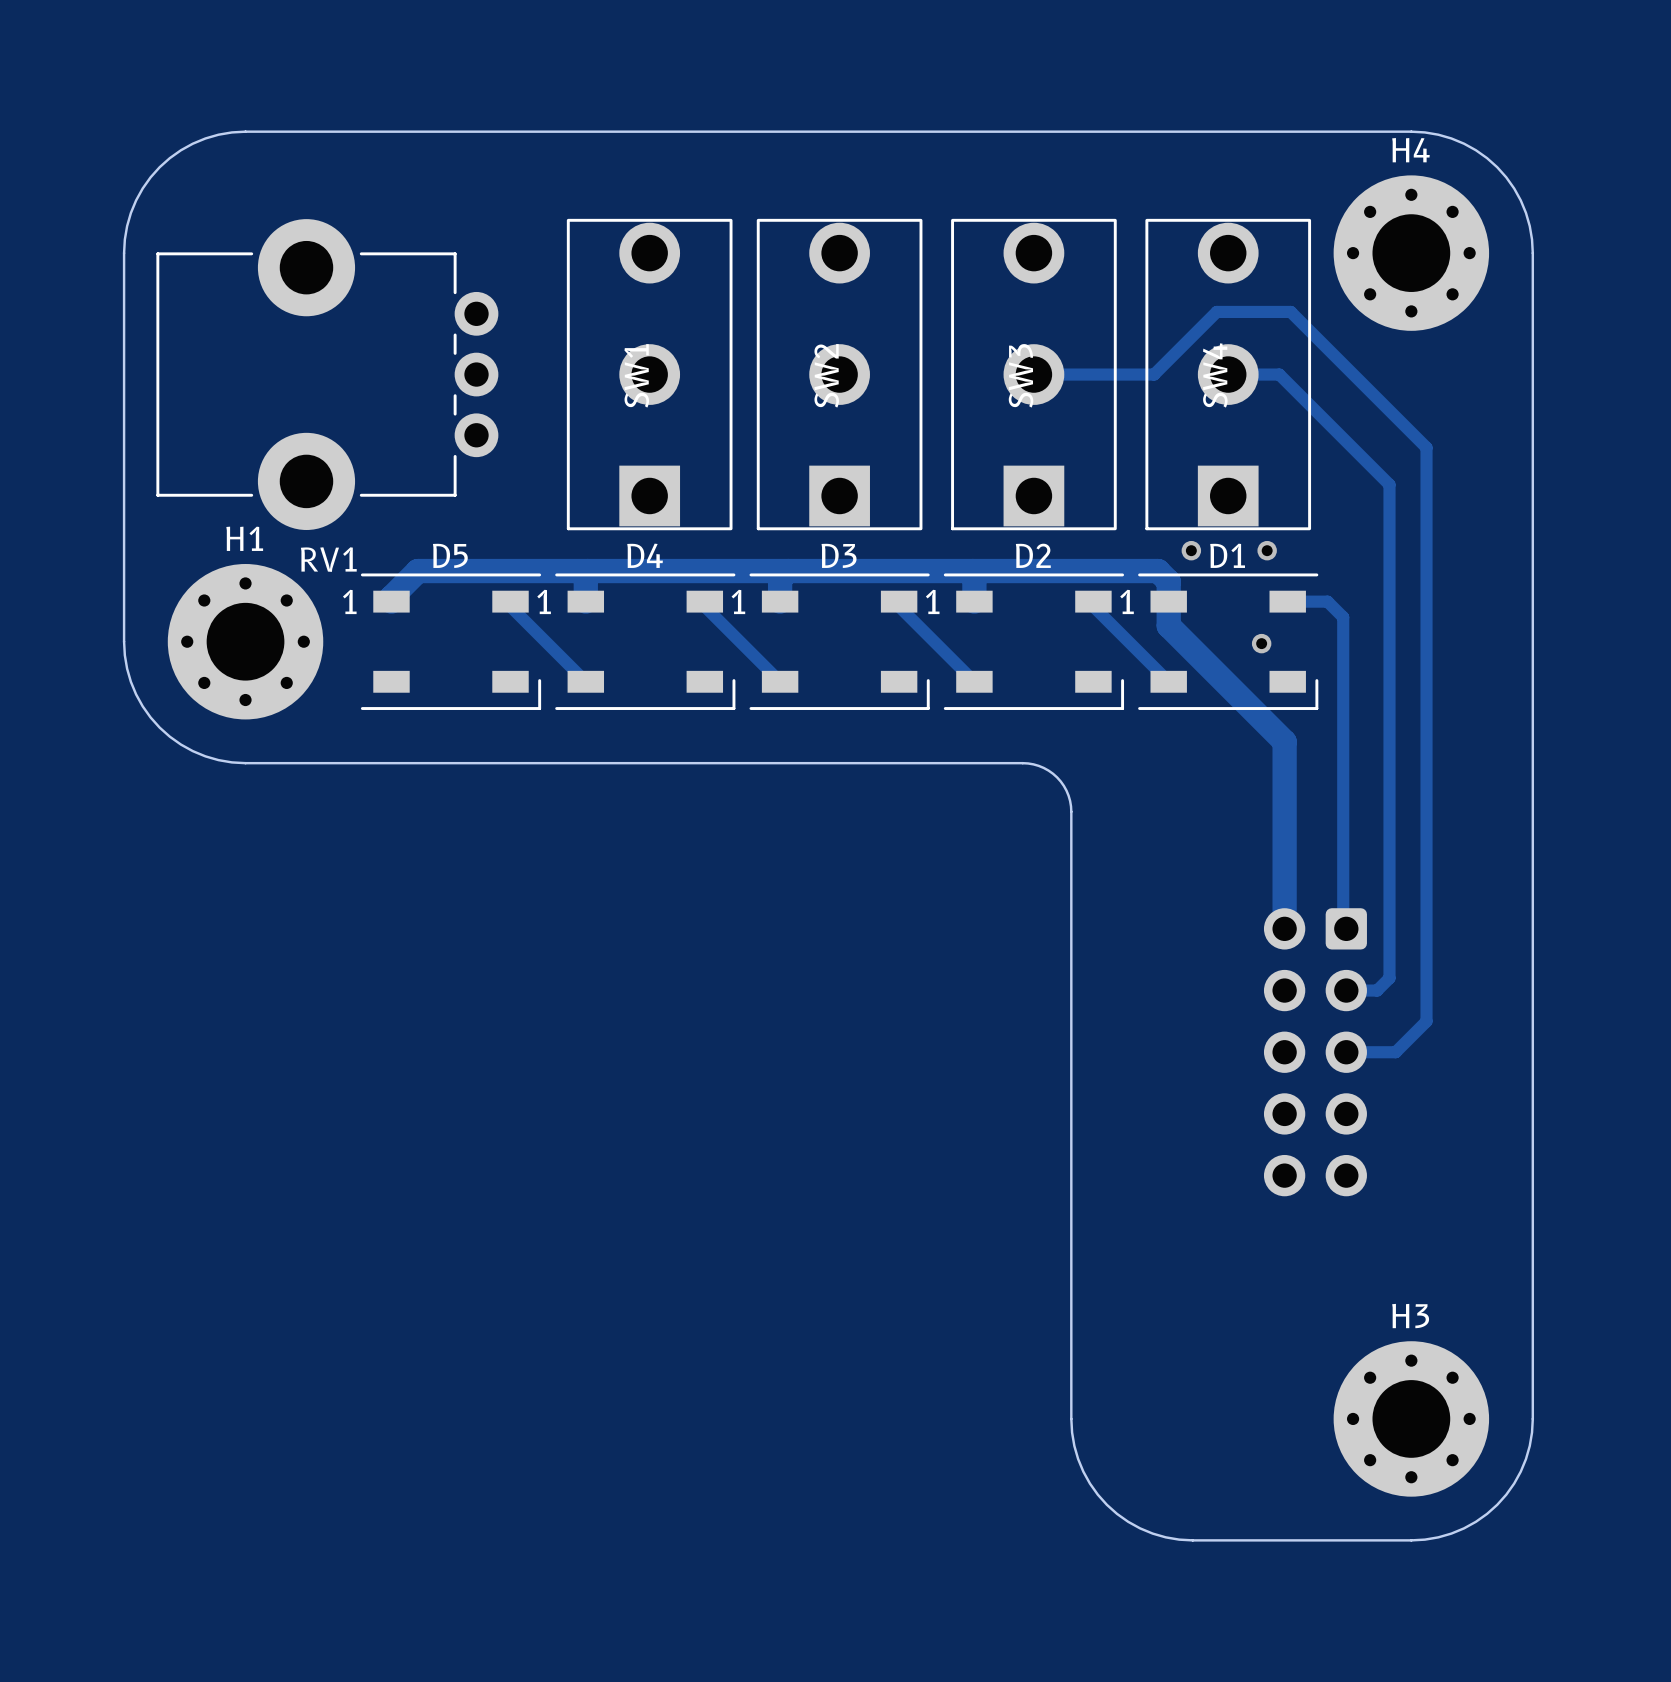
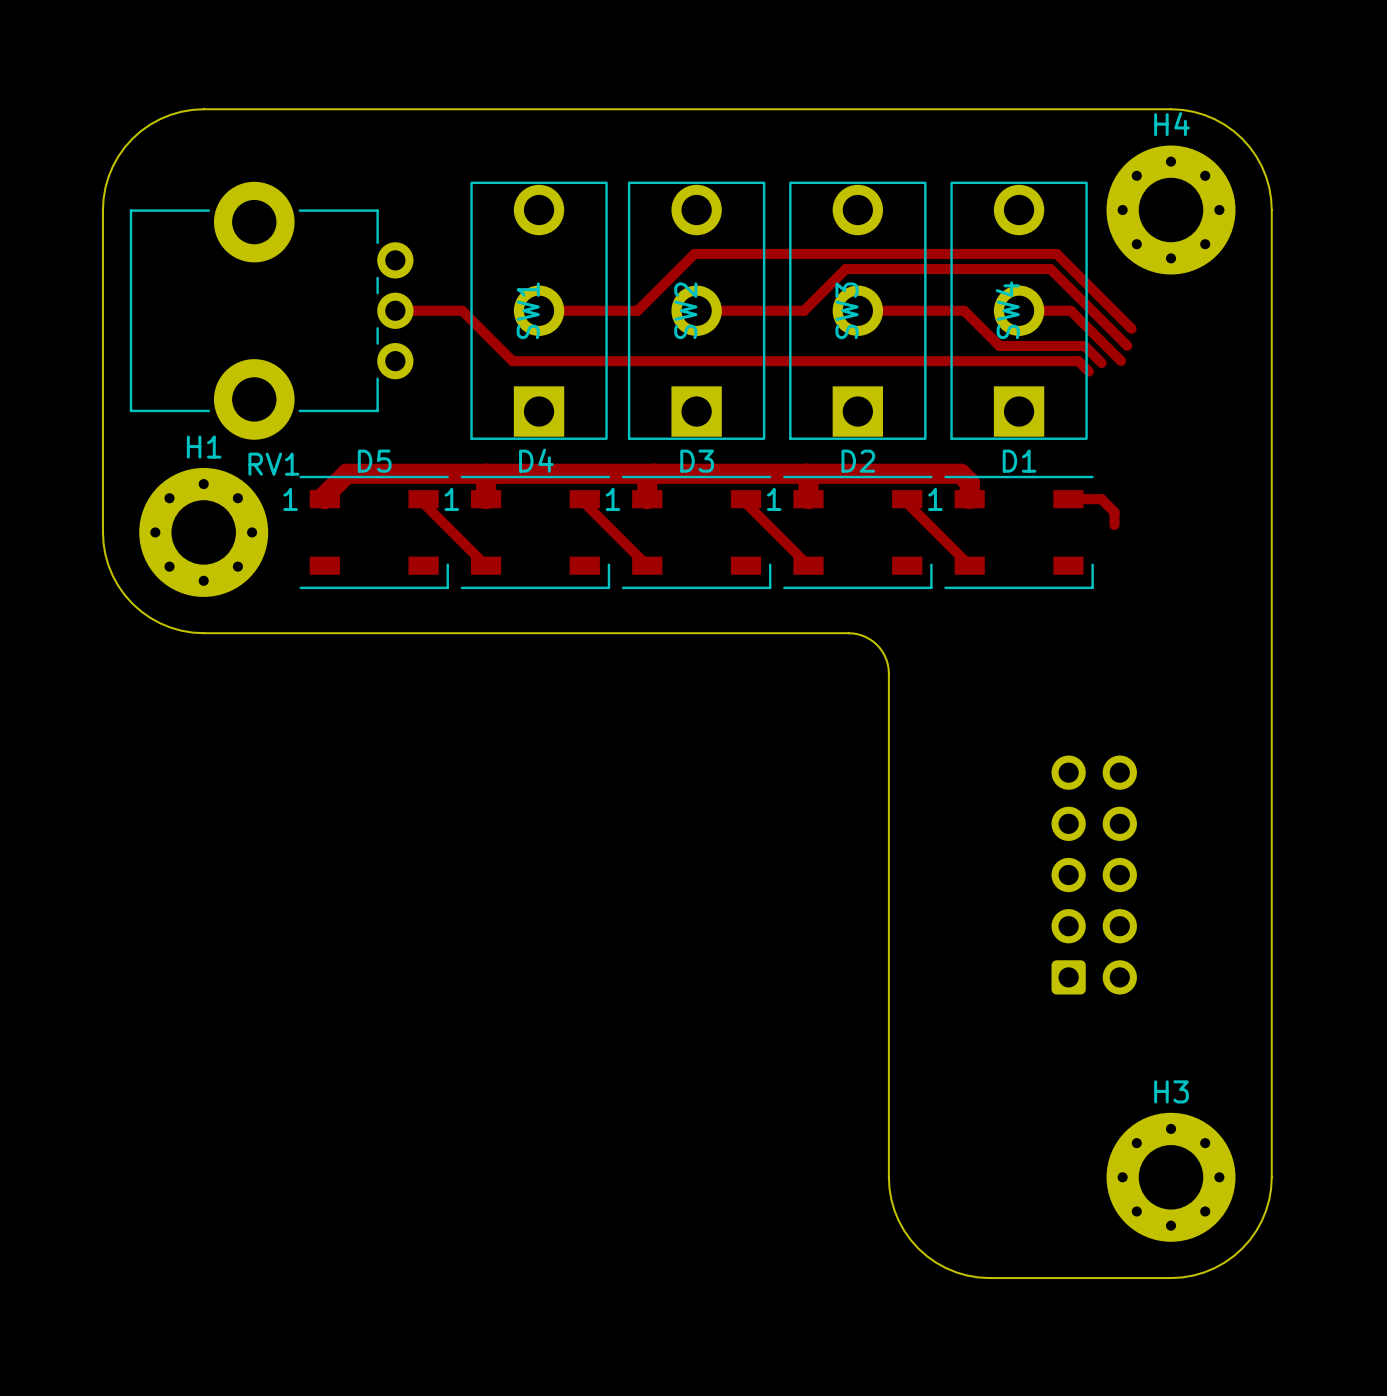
track: none -> (395, 310) (462, 310) (512, 361) (1078, 361) (1088, 371)
track: none -> (539, 310) (637, 310) (694, 253) (1056, 253) (1131, 328)
track: none -> (696, 310) (804, 310) (845, 269) (1050, 269) (1127, 345)
track: (1154, 374) (1216, 311) (1290, 311) (1426, 447) (1426, 1021) (1395, 1052) (1346, 1052) -> (957, 310) (964, 310) (999, 346) (1084, 346) (1101, 362)
track: (1279, 374) (1389, 484) (1389, 978) (1377, 990) (1346, 990) -> (1061, 310) (1070, 310) (1121, 360)
via: (1191, 550) -> none
via: (1267, 550) -> none
track: (1168, 601) (1168, 625) (1284, 741) (1284, 928) -> none
track: (1343, 632) (1343, 925) (1346, 928) -> none
via: (1261, 643) -> none
part rotation: 0° (1315, 1052) -> 180° (1094, 875)

